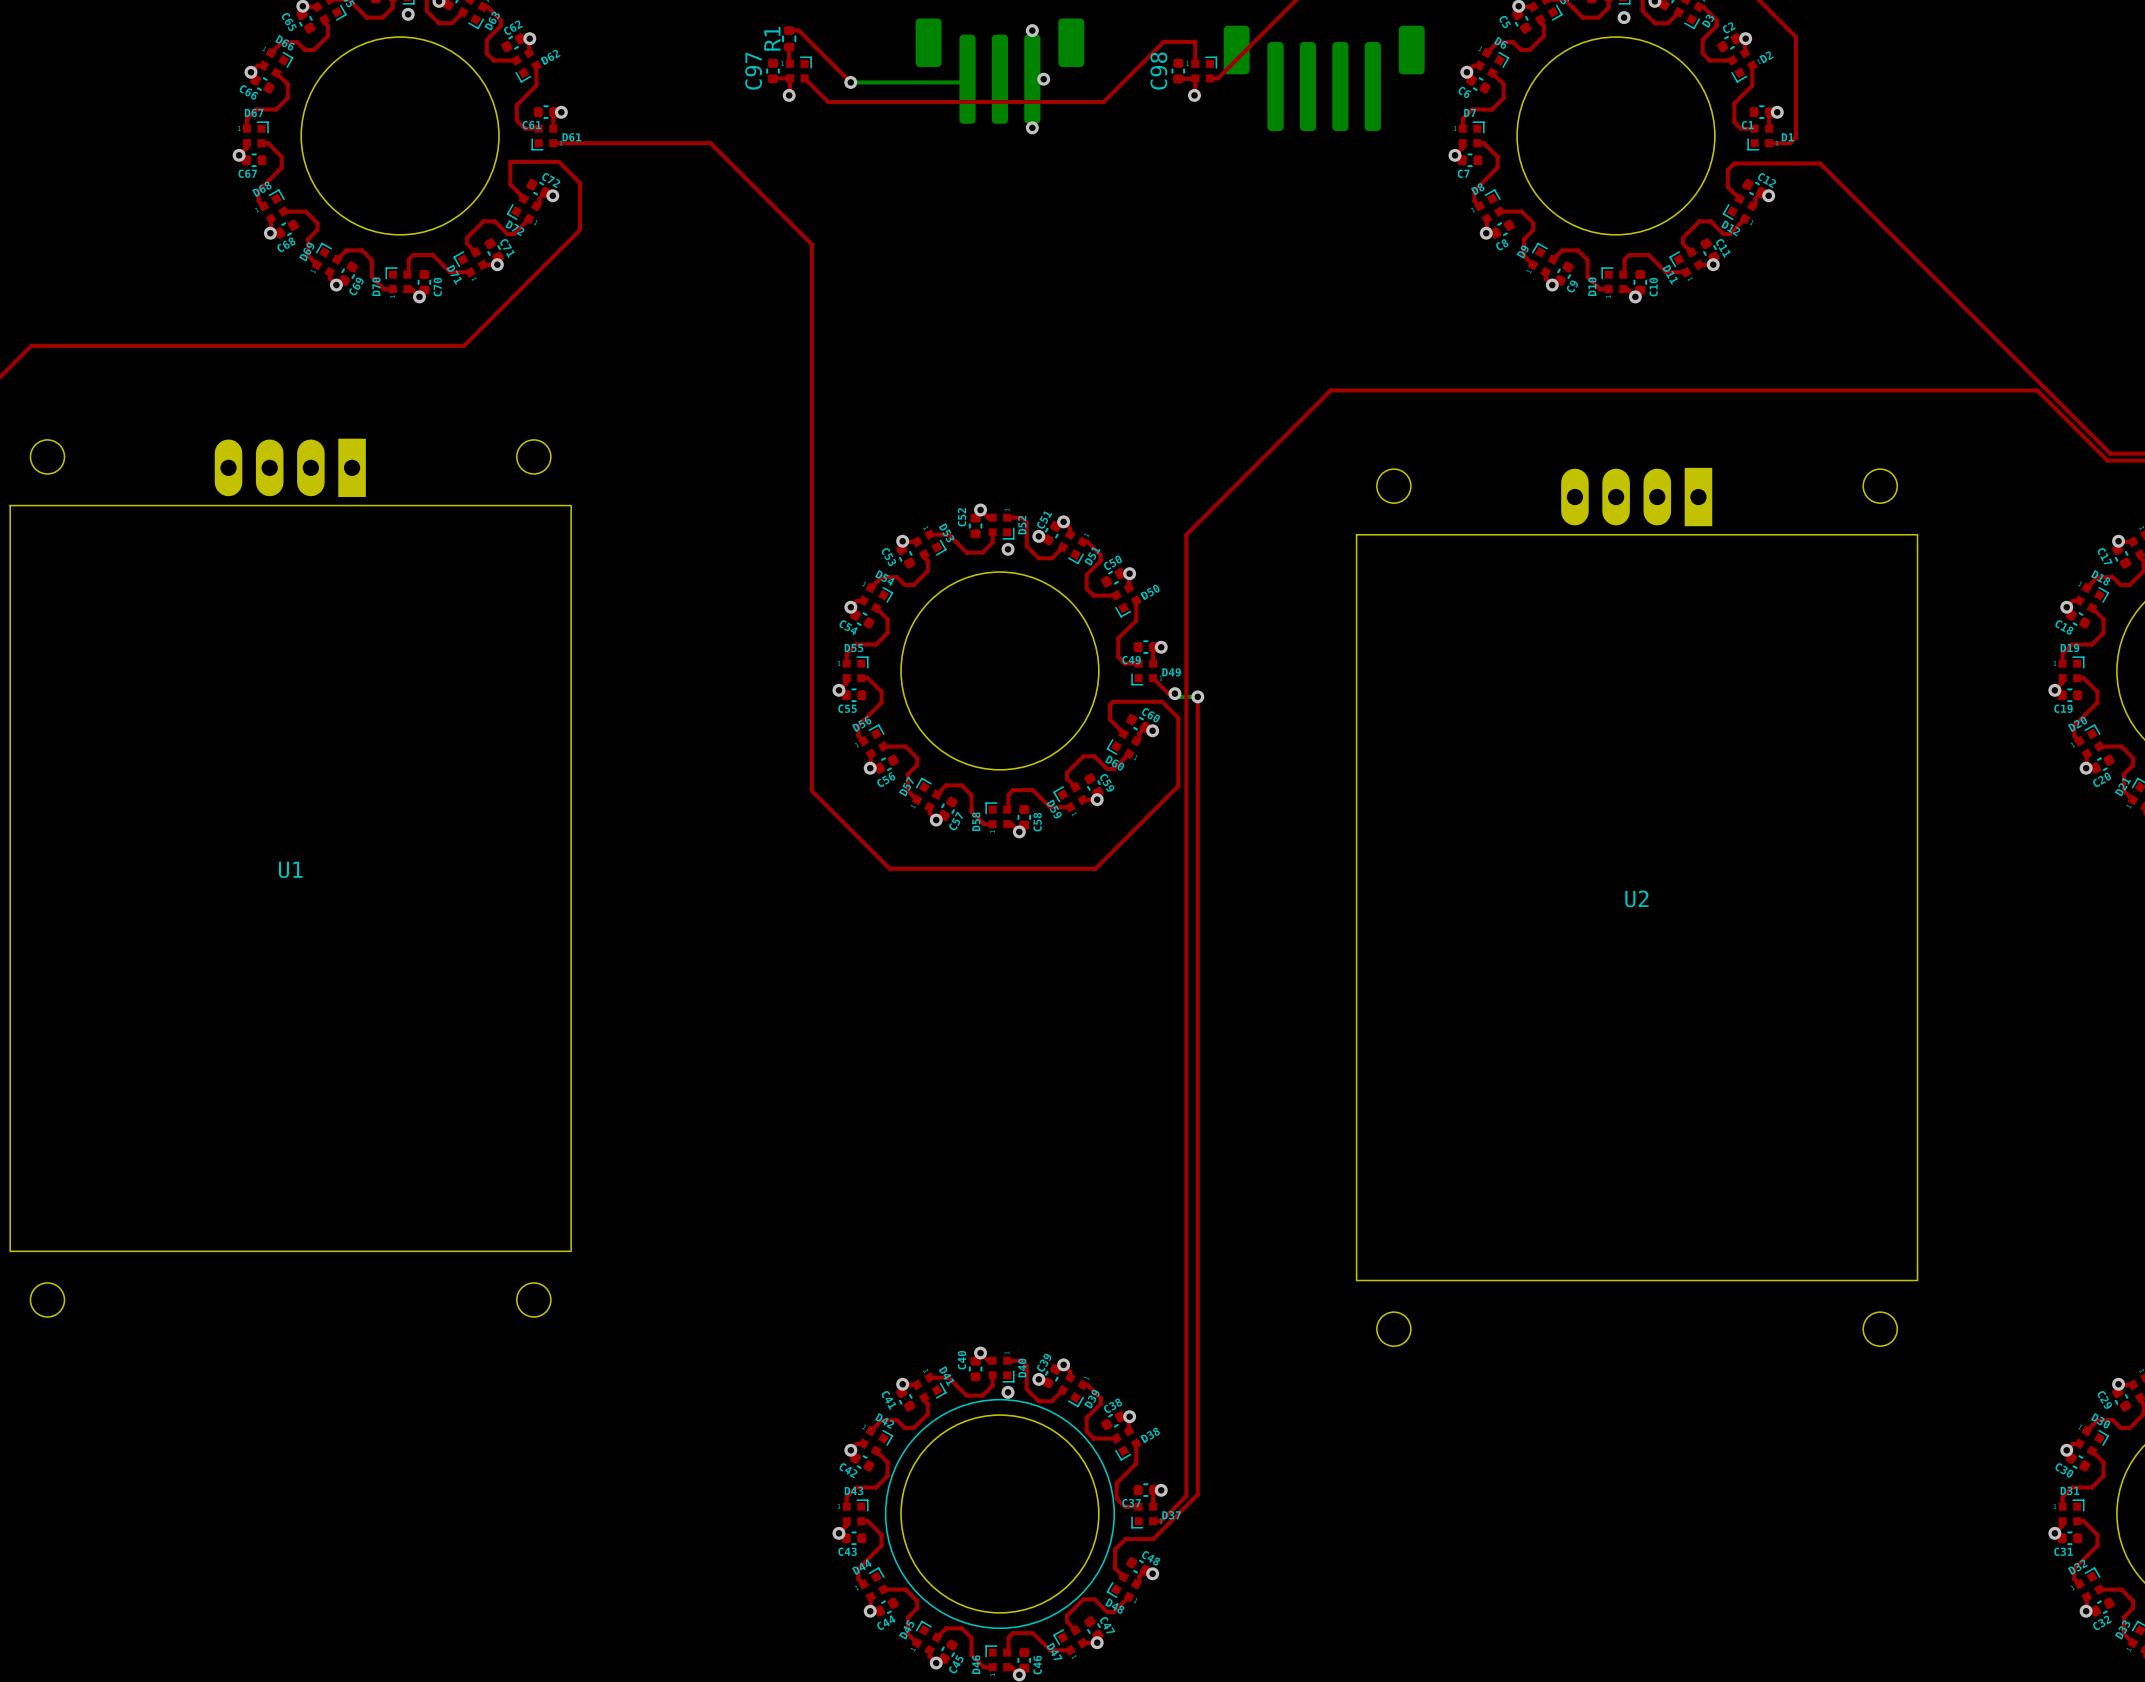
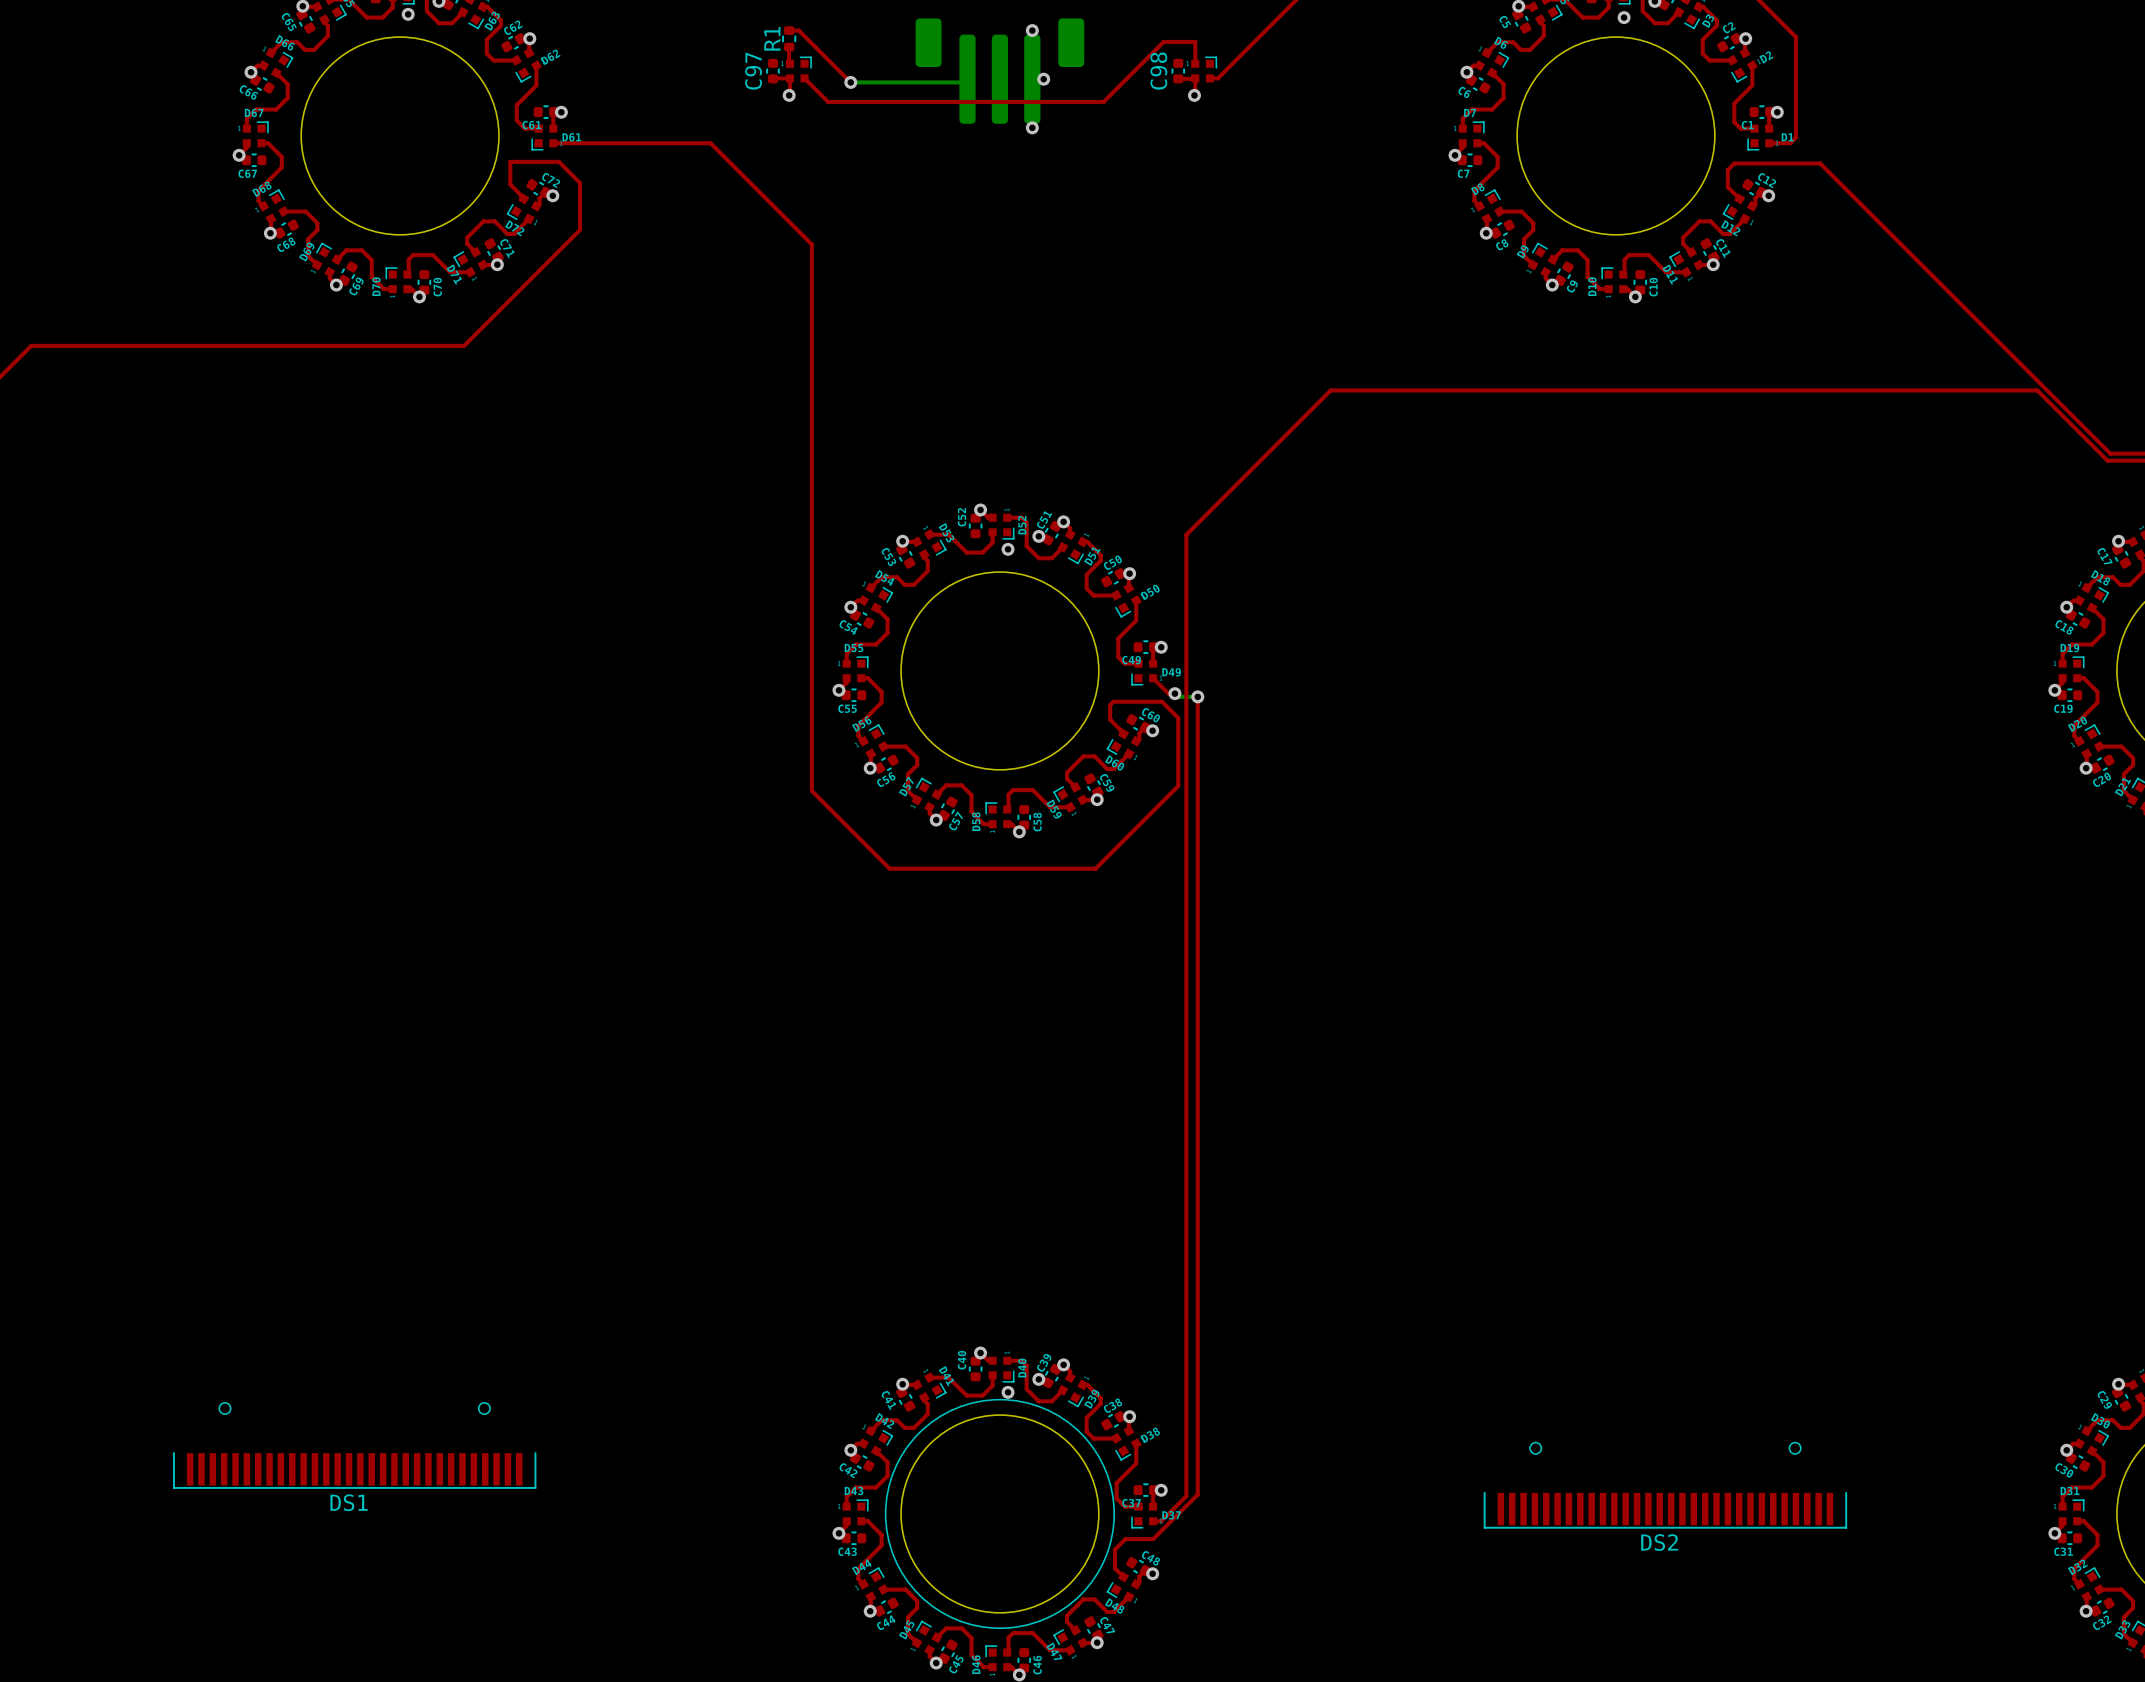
part: (1324, 78) -> none
U1: (290, 877) -> none
U2: (1637, 907) -> none
DS1: none -> (354, 1445)
DS2: none -> (1665, 1485)

